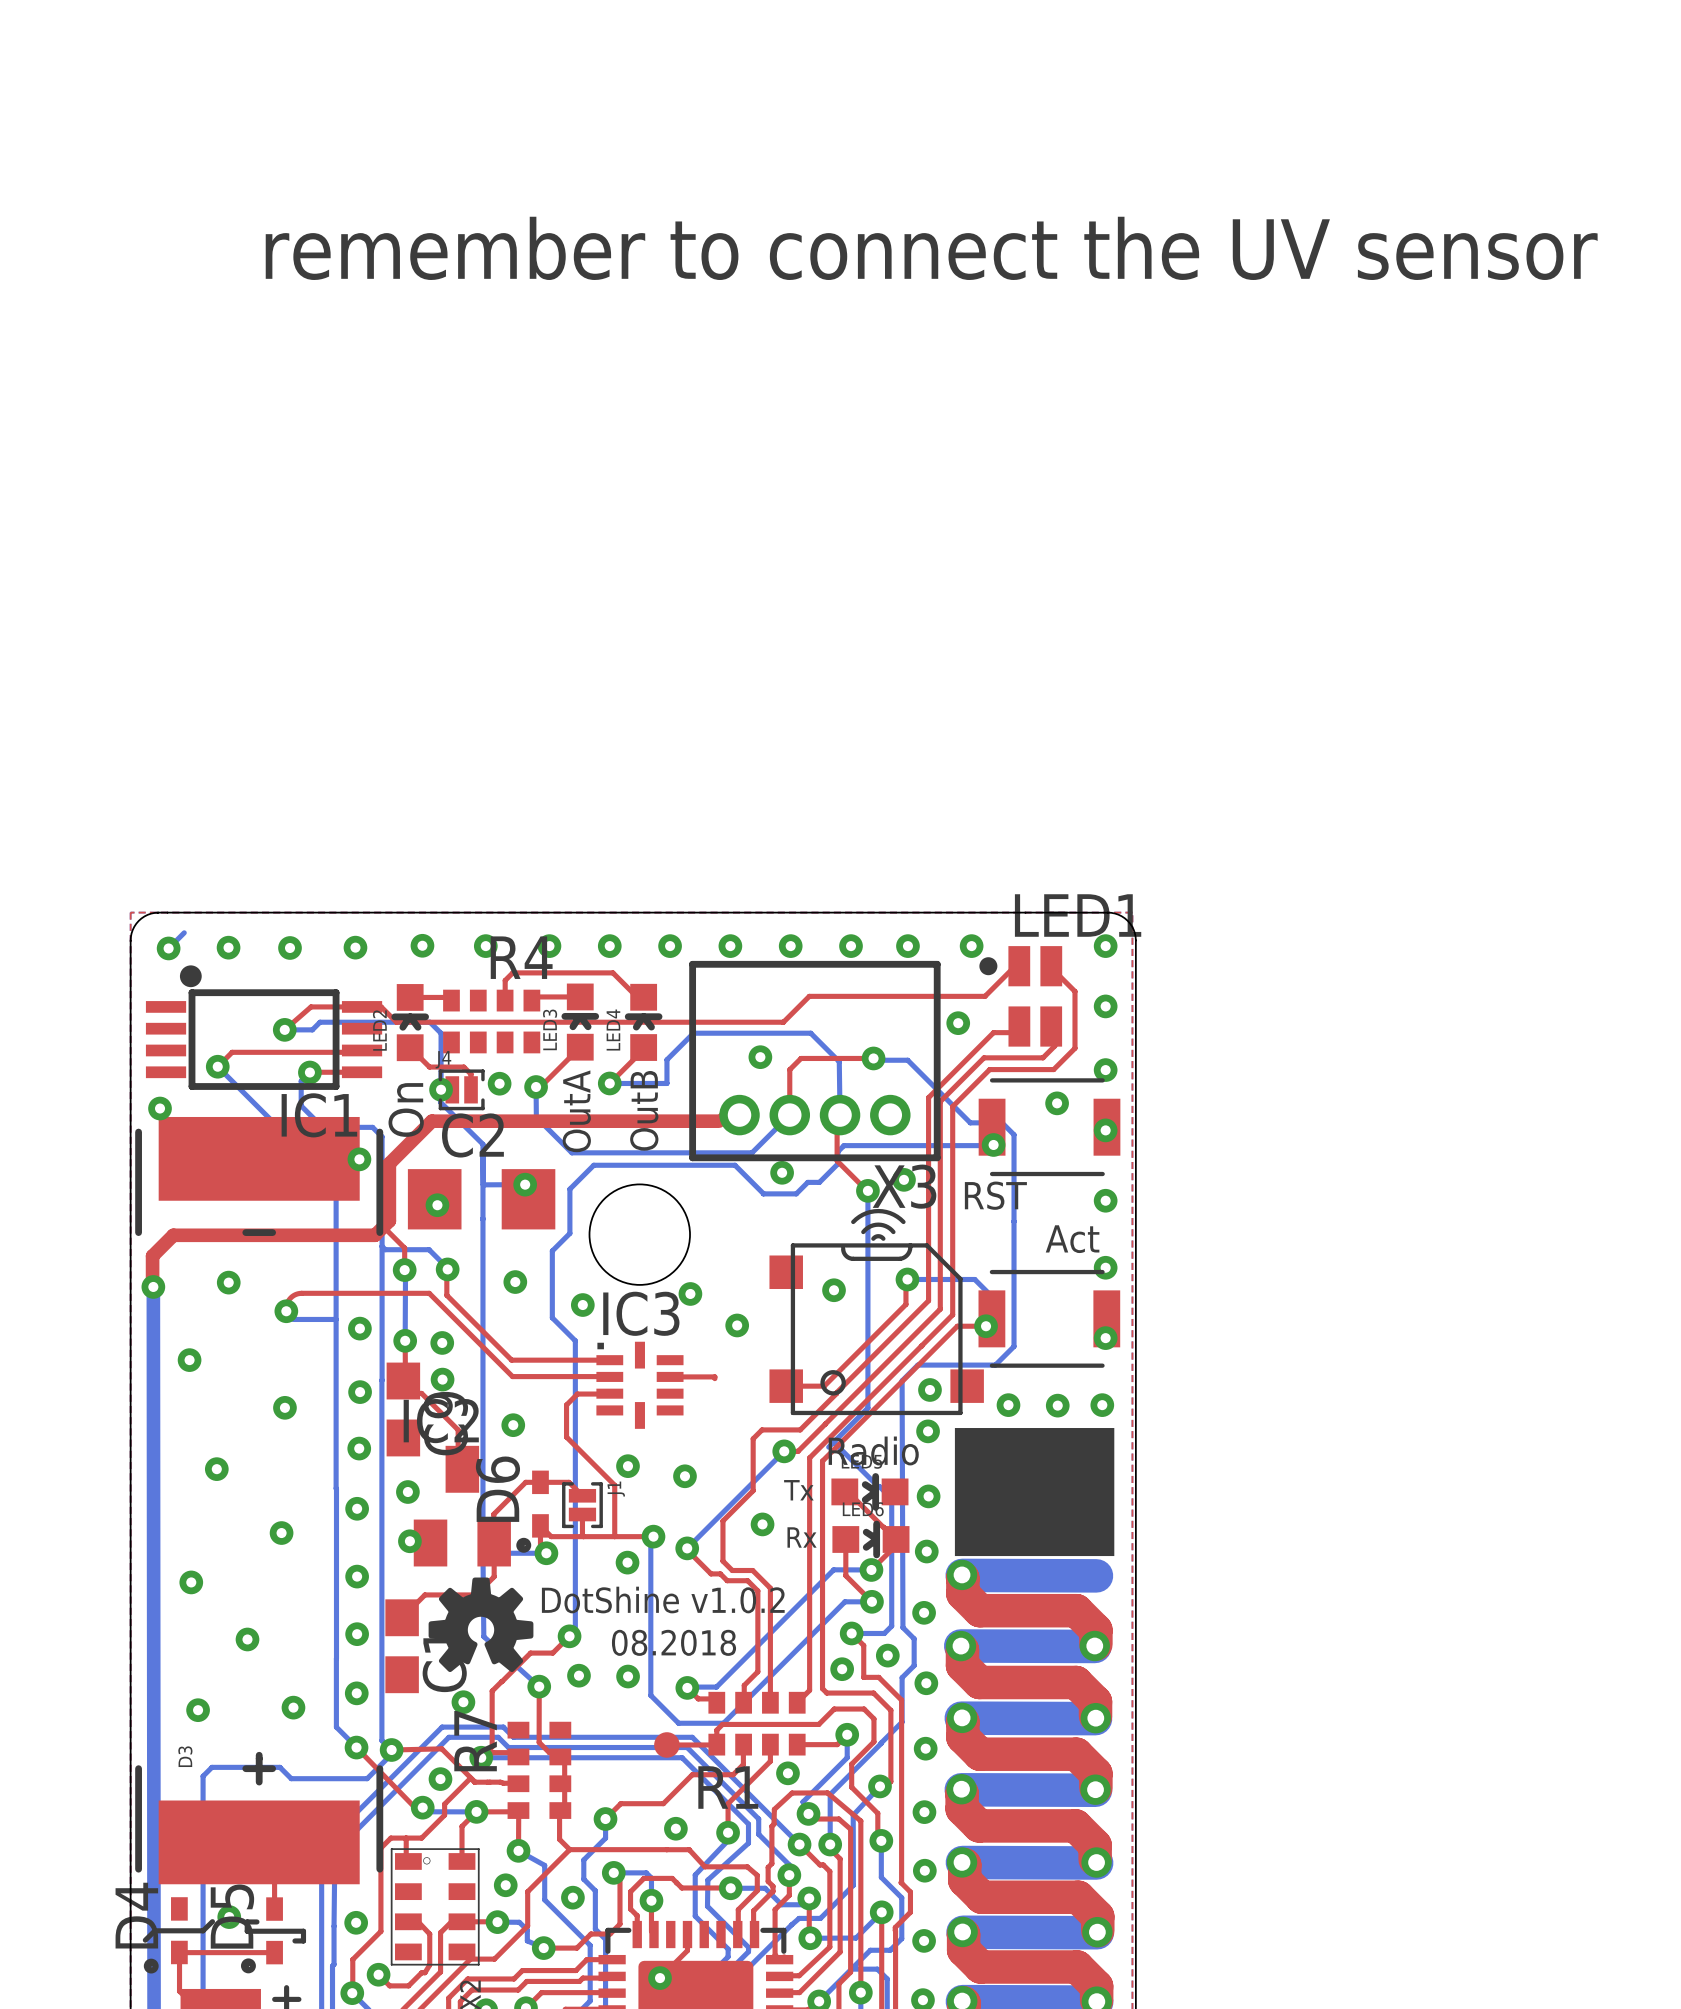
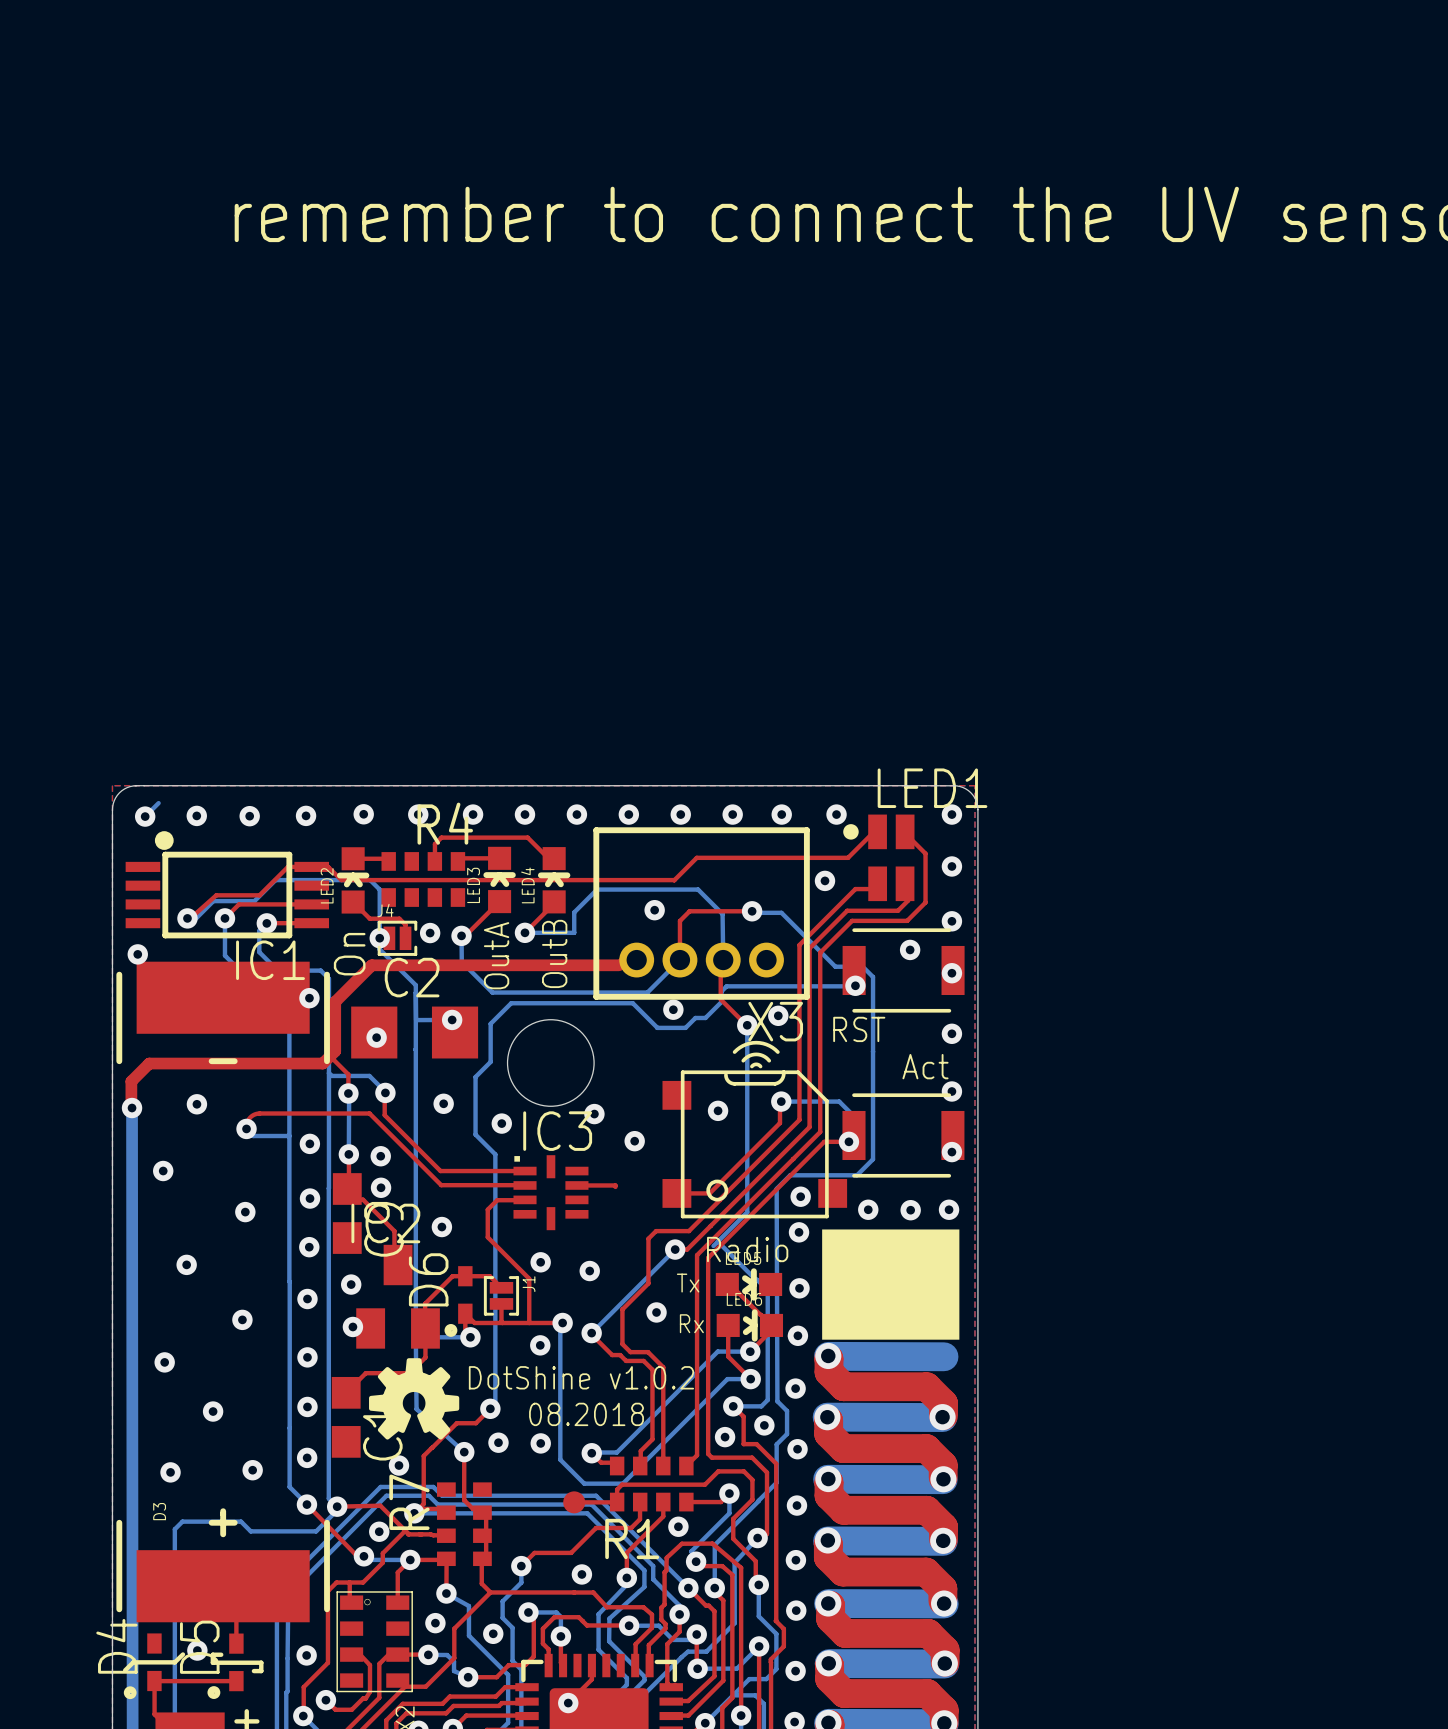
top track: (334, 1006) (311, 1006) (284, 1029) -> (288, 866) (259, 895) (216, 895) (190, 918)
bottom track: (284, 1029) (312, 1029) -> (190, 918) (196, 918) (213, 901) (254, 901) (268, 886)
via position: (284, 1029) -> (224, 918)
top track: (362, 1050) (360, 1052) (232, 1052) (217, 1066) -> (311, 904) (238, 904) (224, 918)
bottom track: (217, 1066) (272, 1121) -> (224, 918) (224, 955) (235, 965)

